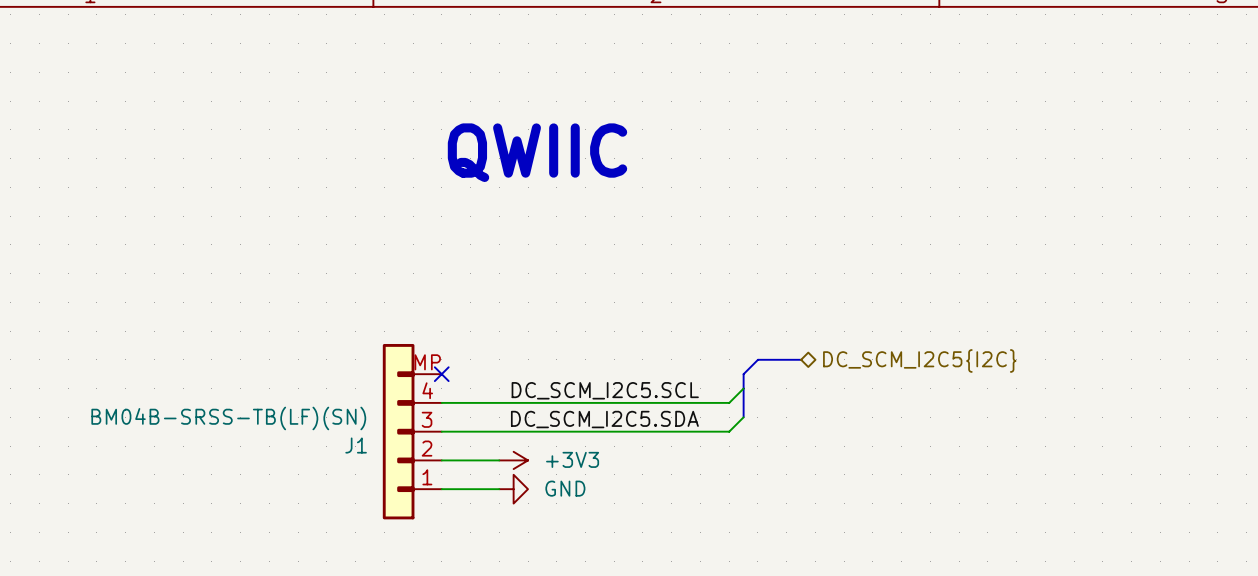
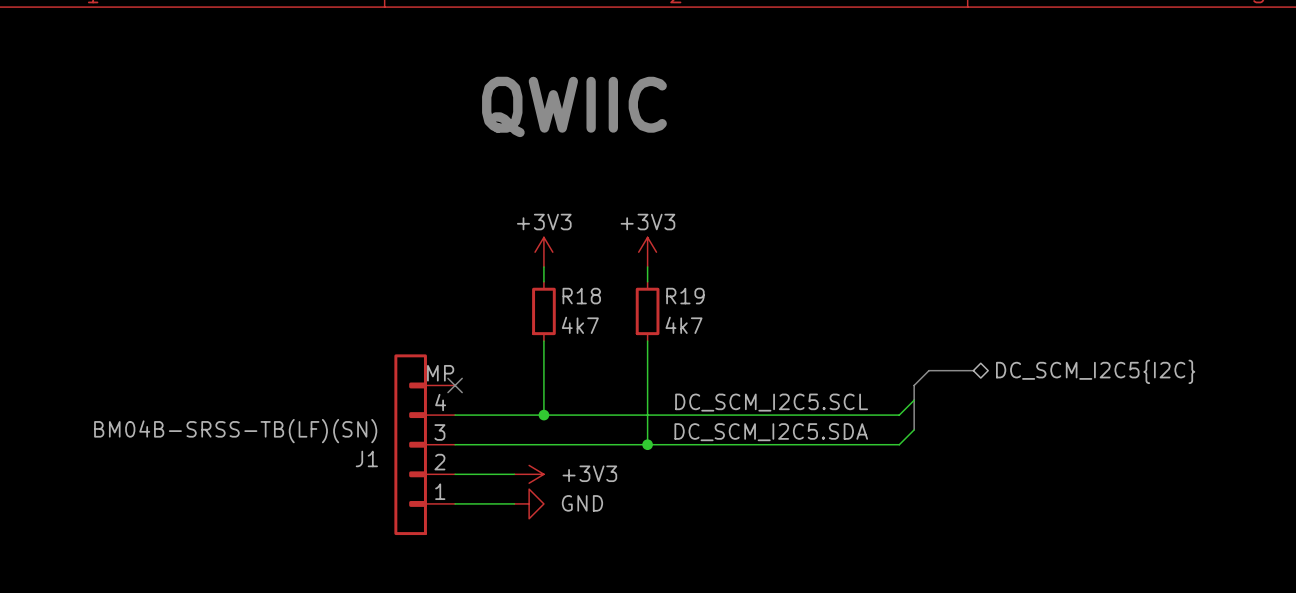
text position: QWIIC (537, 152) -> QWIIC (574, 106)
power symbol: none -> +3V3 (543, 252)
power symbol: none -> +3V3 (647, 252)
wire: none -> (543, 267) (543, 281)
wire: none -> (647, 267) (647, 281)
R18: none -> (543, 311)
R19: none -> (647, 311)
wire: none -> (543, 341) (543, 415)
wire: none -> (647, 341) (647, 444)
bus: (801, 359) (757, 359) (743, 374) (743, 417) -> (973, 370) (928, 370) (914, 385) (914, 429)
hierarchical label position: DC_SCM_I2C5{I2C} (919, 360) -> DC_SCM_I2C5{I2C} (1095, 371)
wire: (743, 388) (729, 402) -> (914, 400) (899, 415) (751, 415)
label position: DC_SCM_I2C5.SCL (605, 390) -> DC_SCM_I2C5.SCL (771, 402)
junction: none -> (543, 415)
wire: (743, 417) (729, 431) -> (914, 429) (899, 444) (751, 444)
label position: DC_SCM_I2C5.SDA (604, 419) -> DC_SCM_I2C5.SDA (771, 432)
junction: none -> (647, 444)

